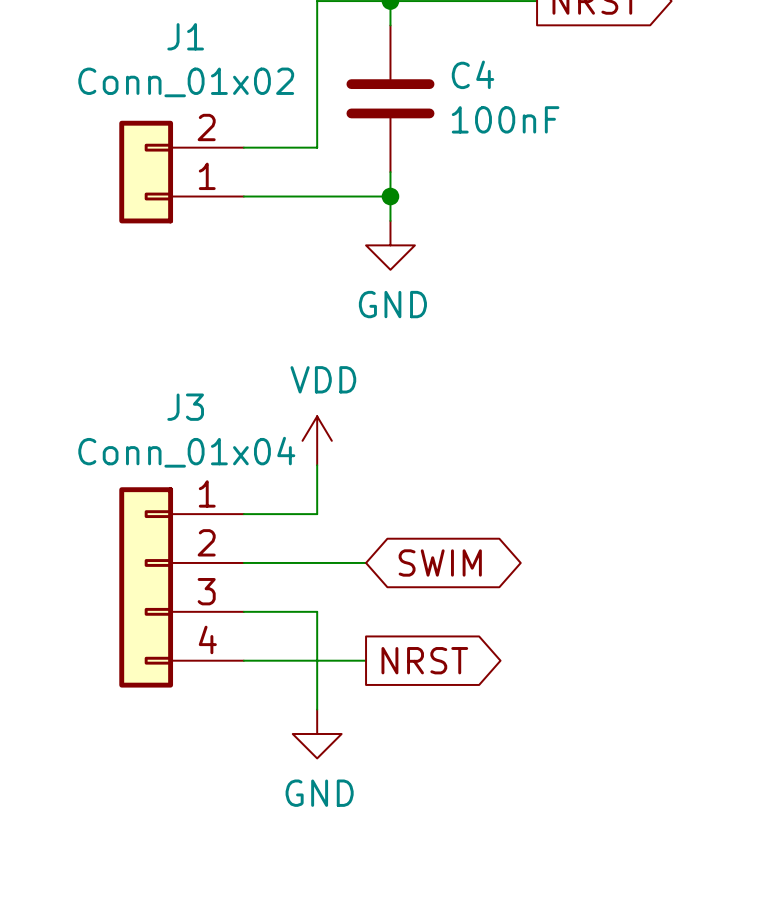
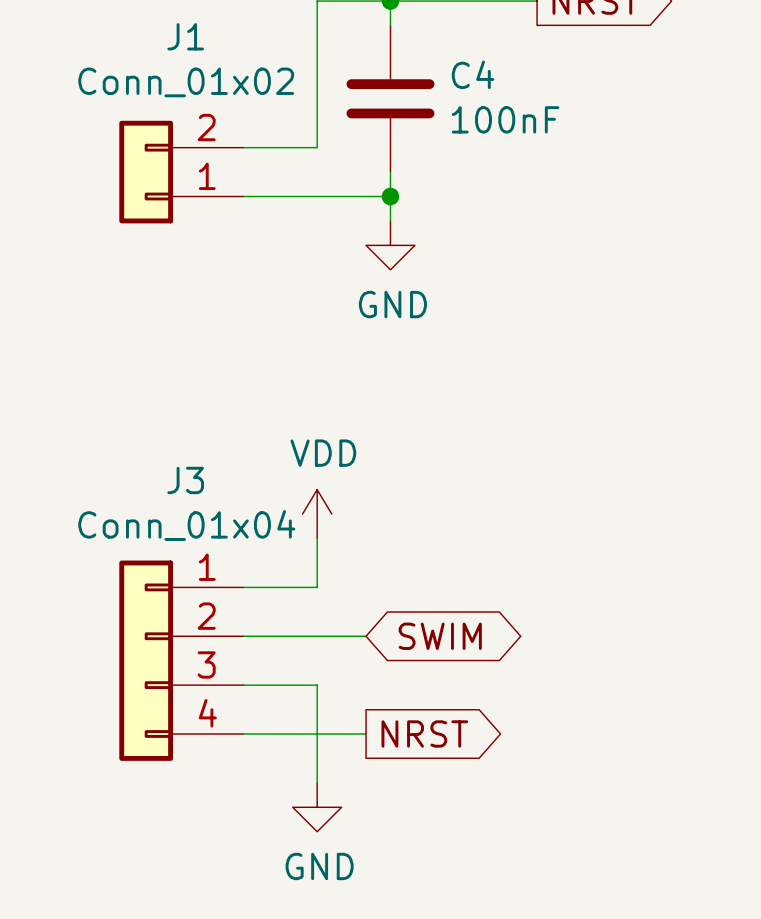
power symbol position: VDD (317, 440) -> VDD (317, 514)
wire: (317, 465) (317, 514) (243, 514) -> (317, 538) (317, 587) (243, 587)
wire: (243, 562) (366, 562) -> (243, 636) (366, 636)
global label position: SWIM (440, 562) -> SWIM (440, 636)
J3 position: (181, 587) -> (181, 660)
wire: (243, 611) (317, 611) (317, 685) -> (243, 685) (317, 685)
wire: (243, 660) (366, 660) -> (243, 733) (366, 733)
global label position: NRST (424, 660) -> NRST (424, 733)
wire: none -> (317, 709) (317, 782)
power symbol position: GND (317, 733) -> GND (317, 807)

